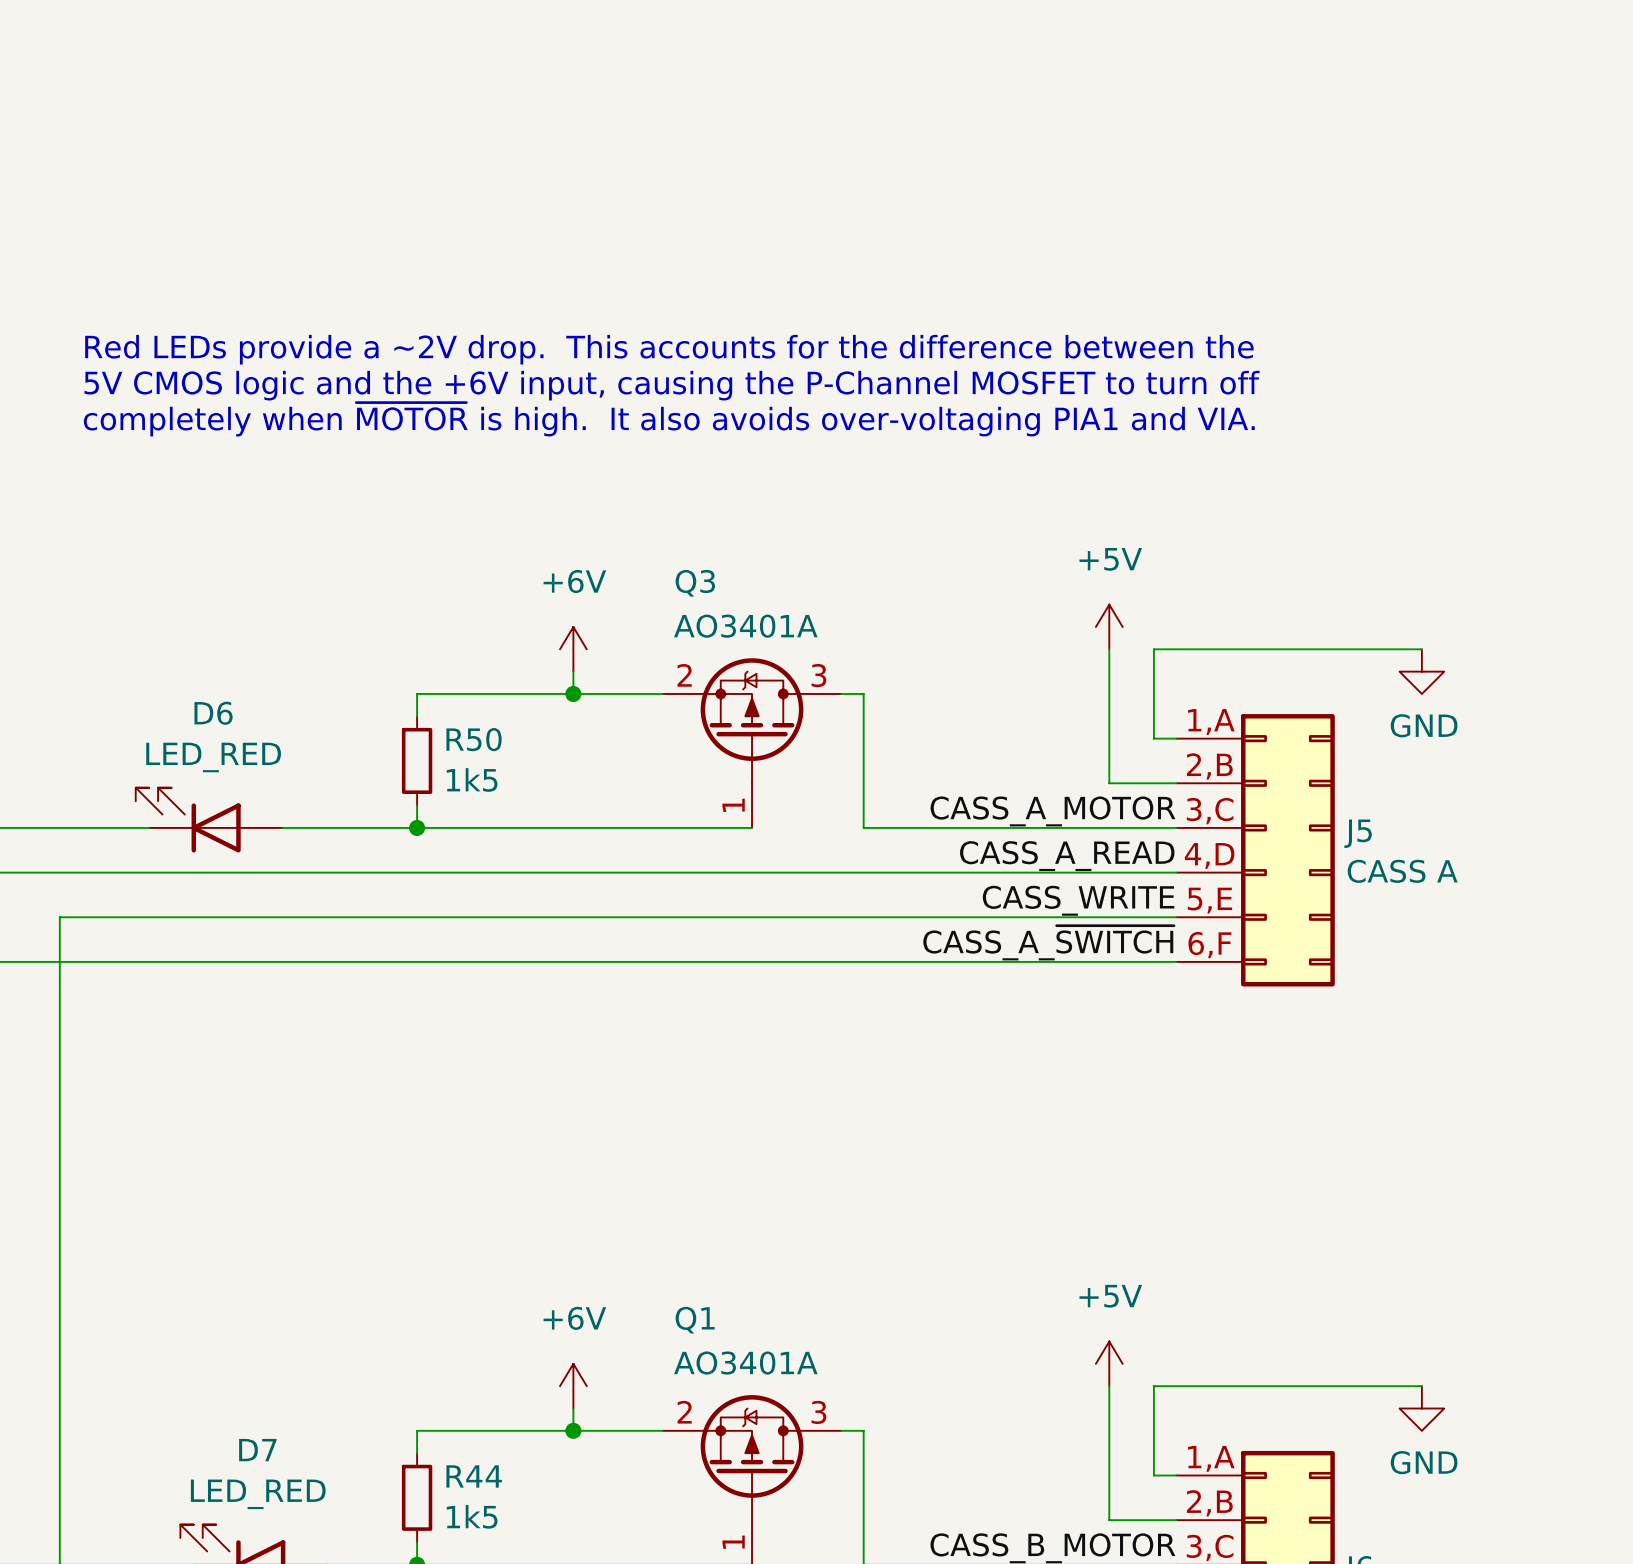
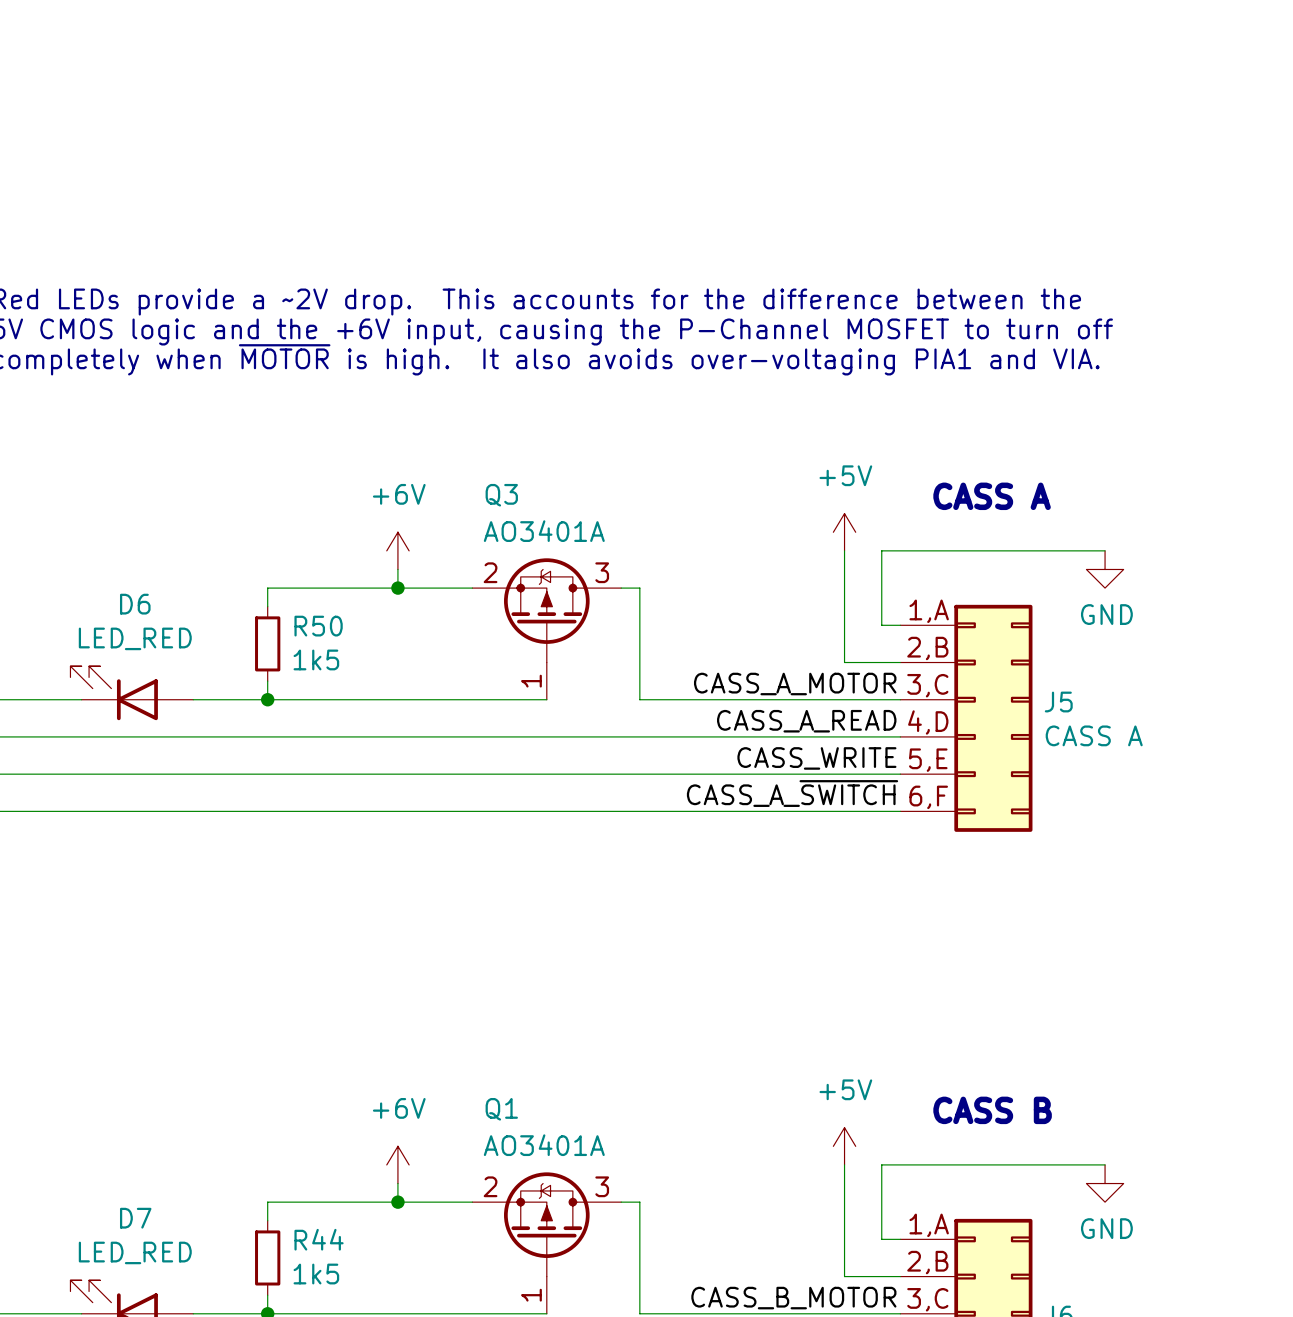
text: none -> CASS A (992, 496)
D6 position: (209, 820) -> (131, 693)
text: none -> CASS B (992, 1110)

